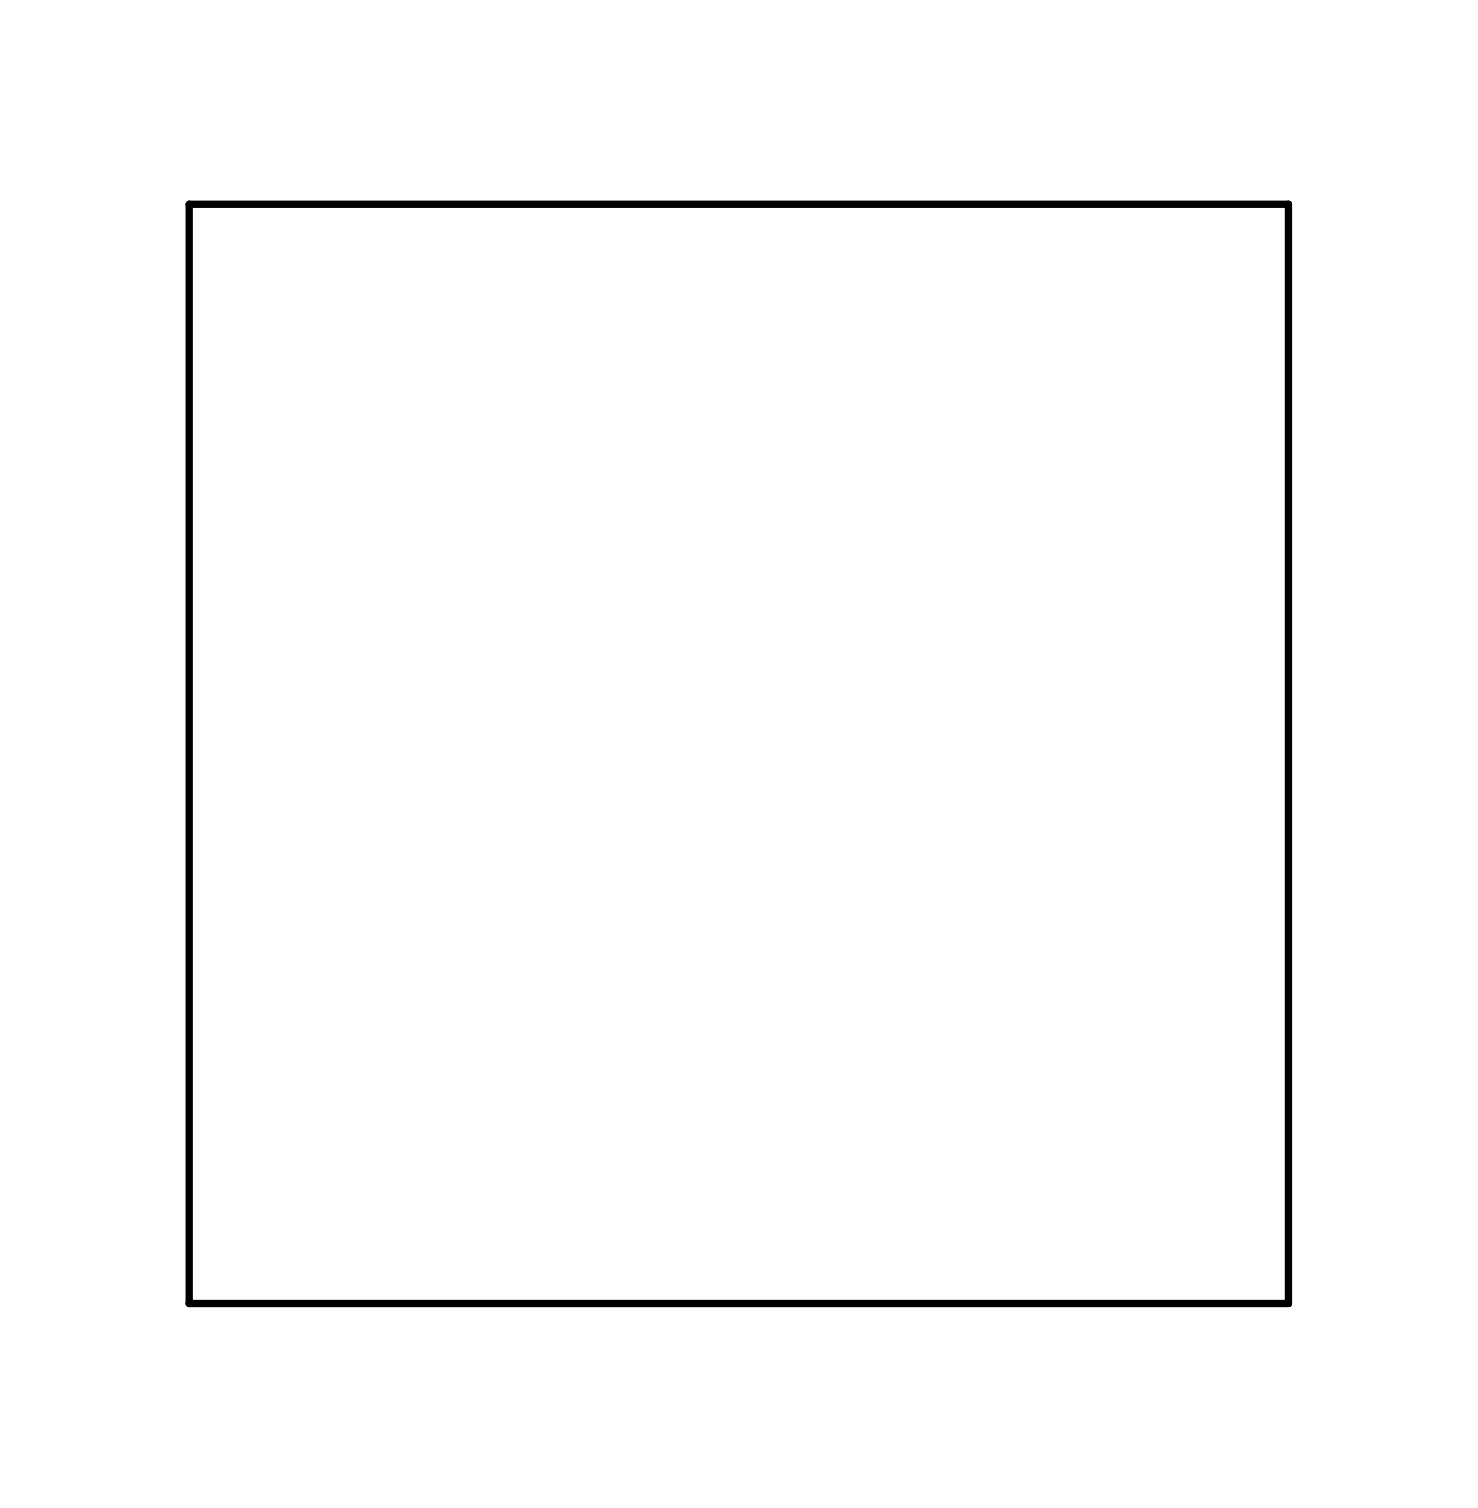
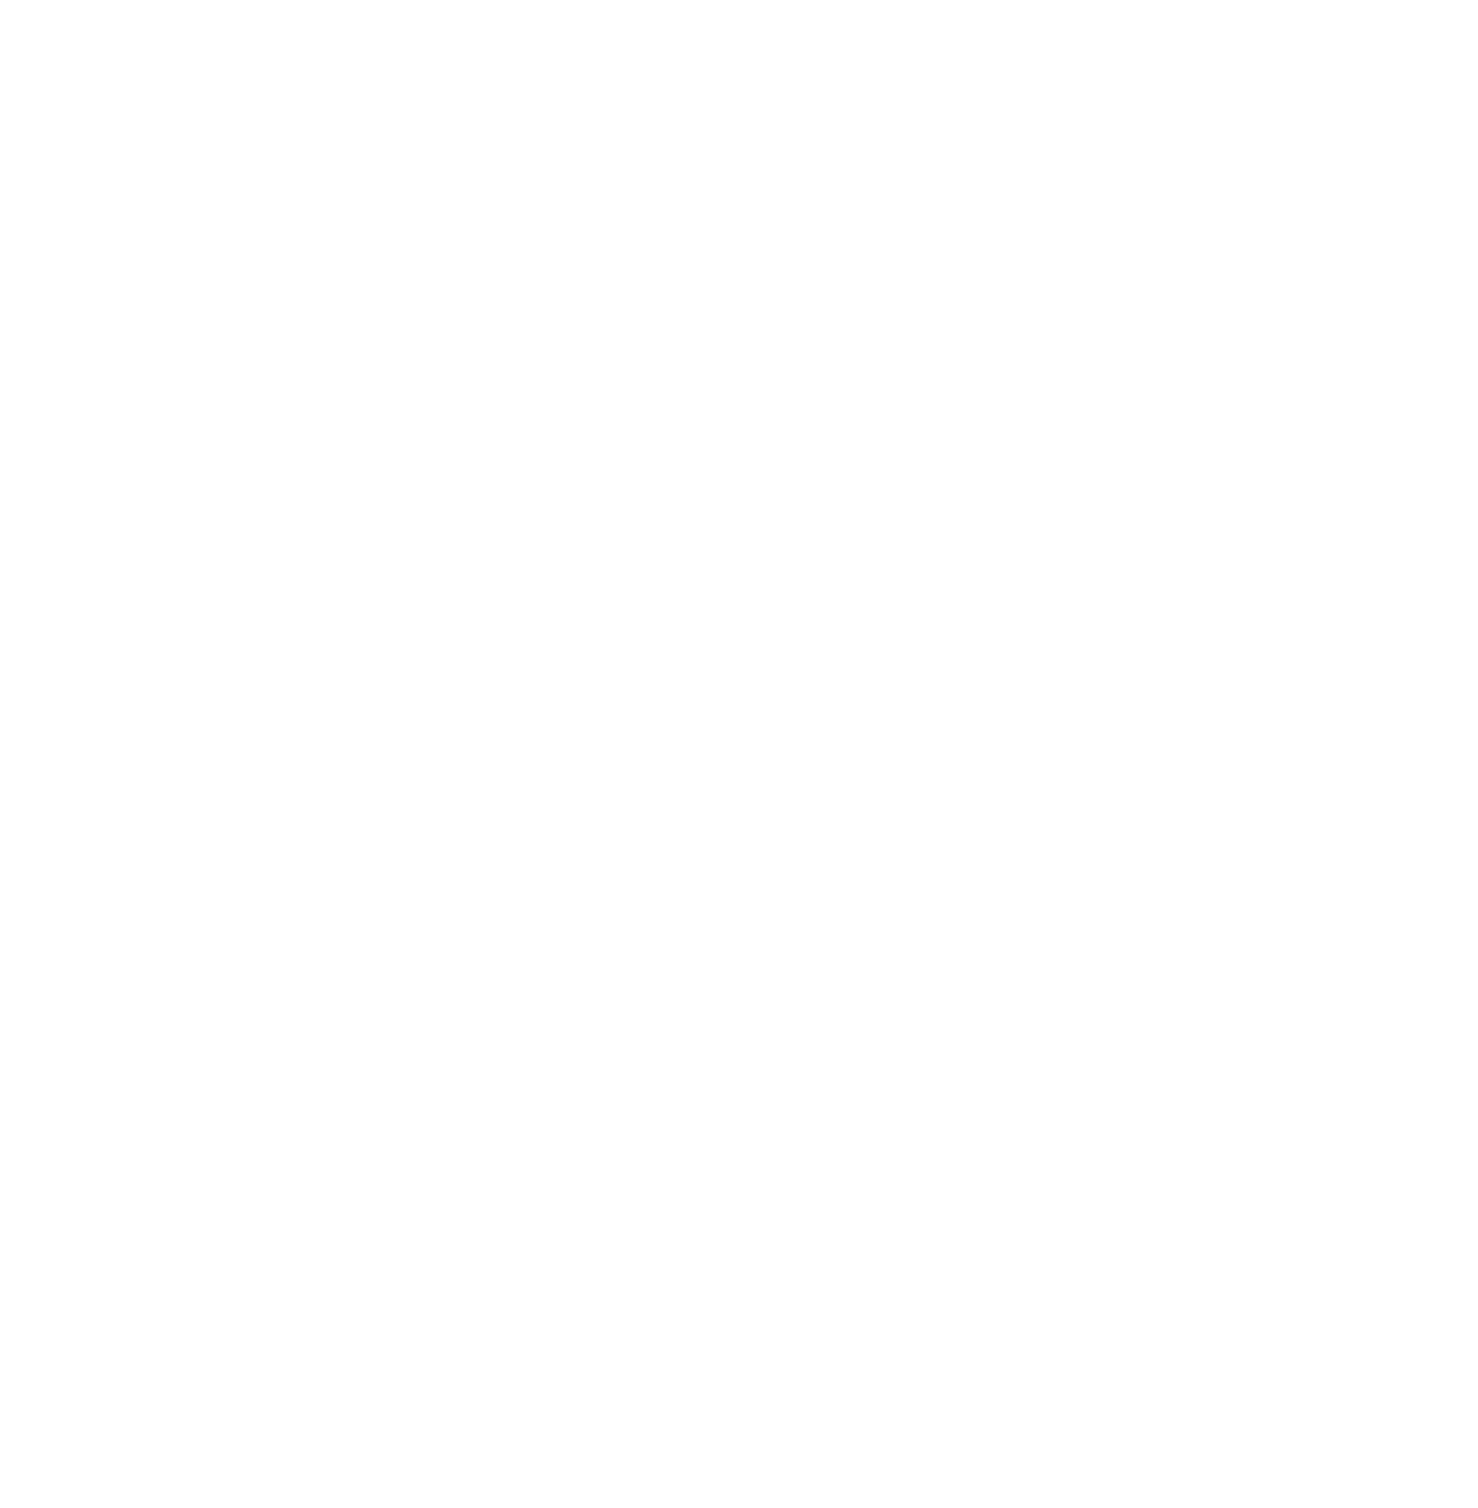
board edge: (1288, 204) (189, 204) (189, 1303) (1288, 1303) (1288, 204) -> none

